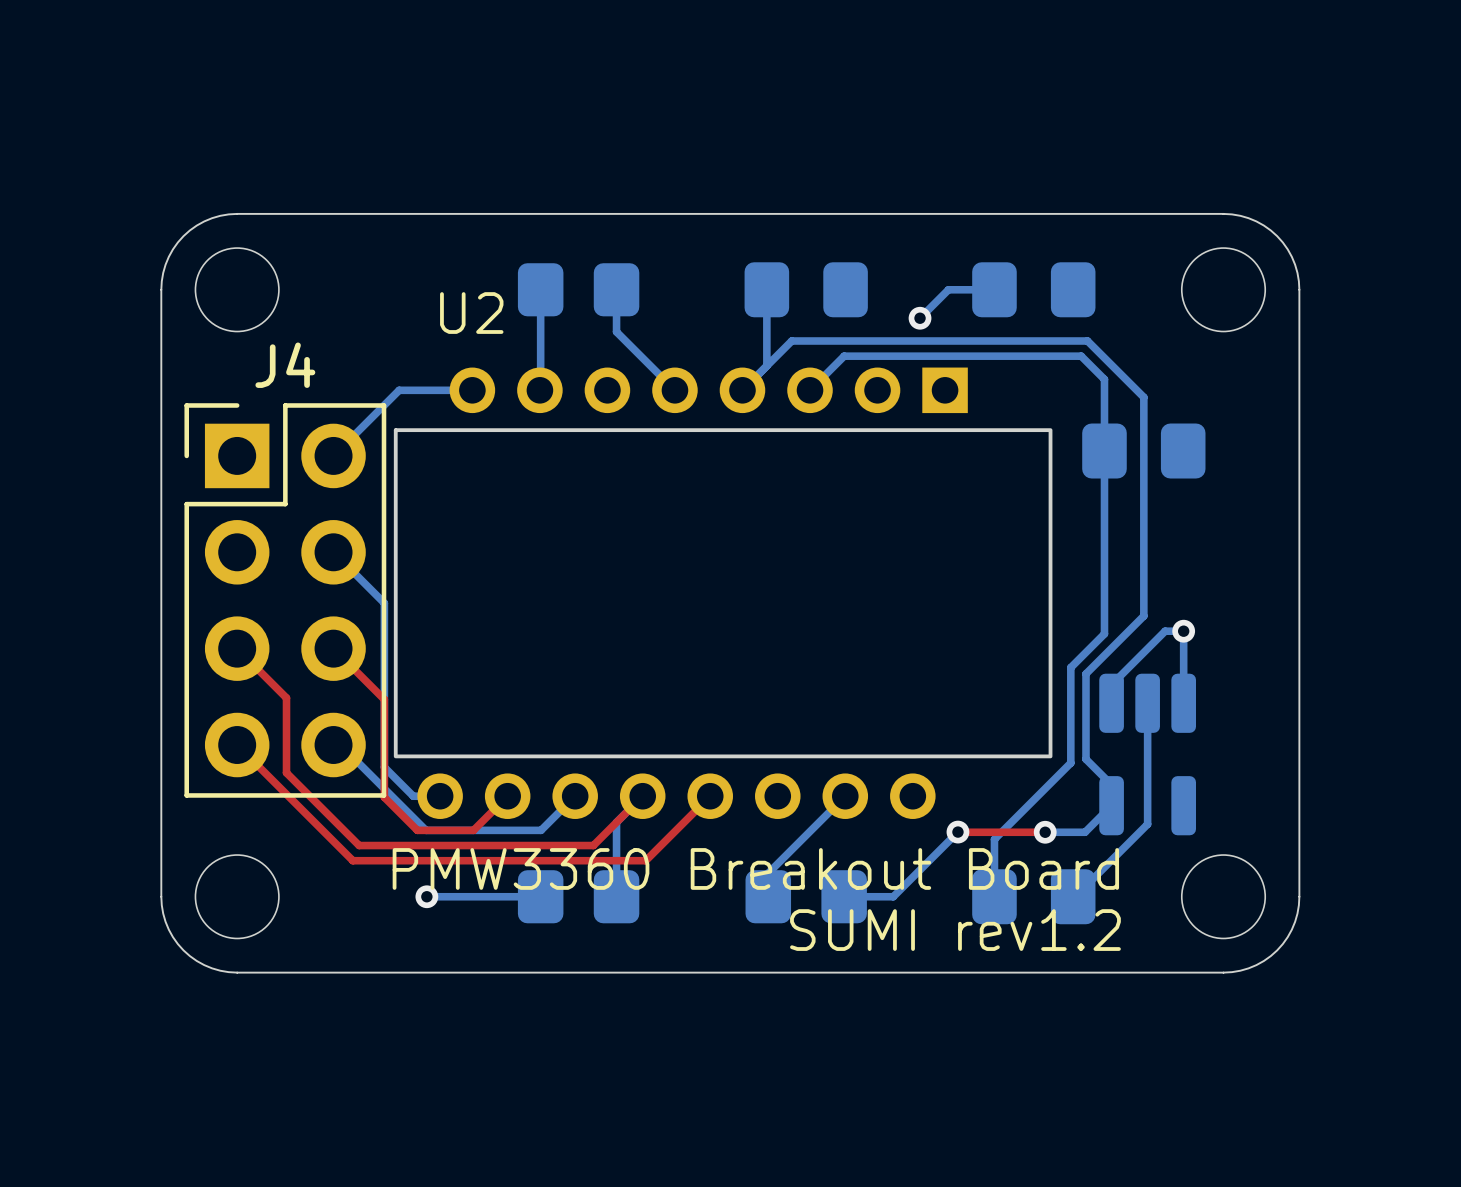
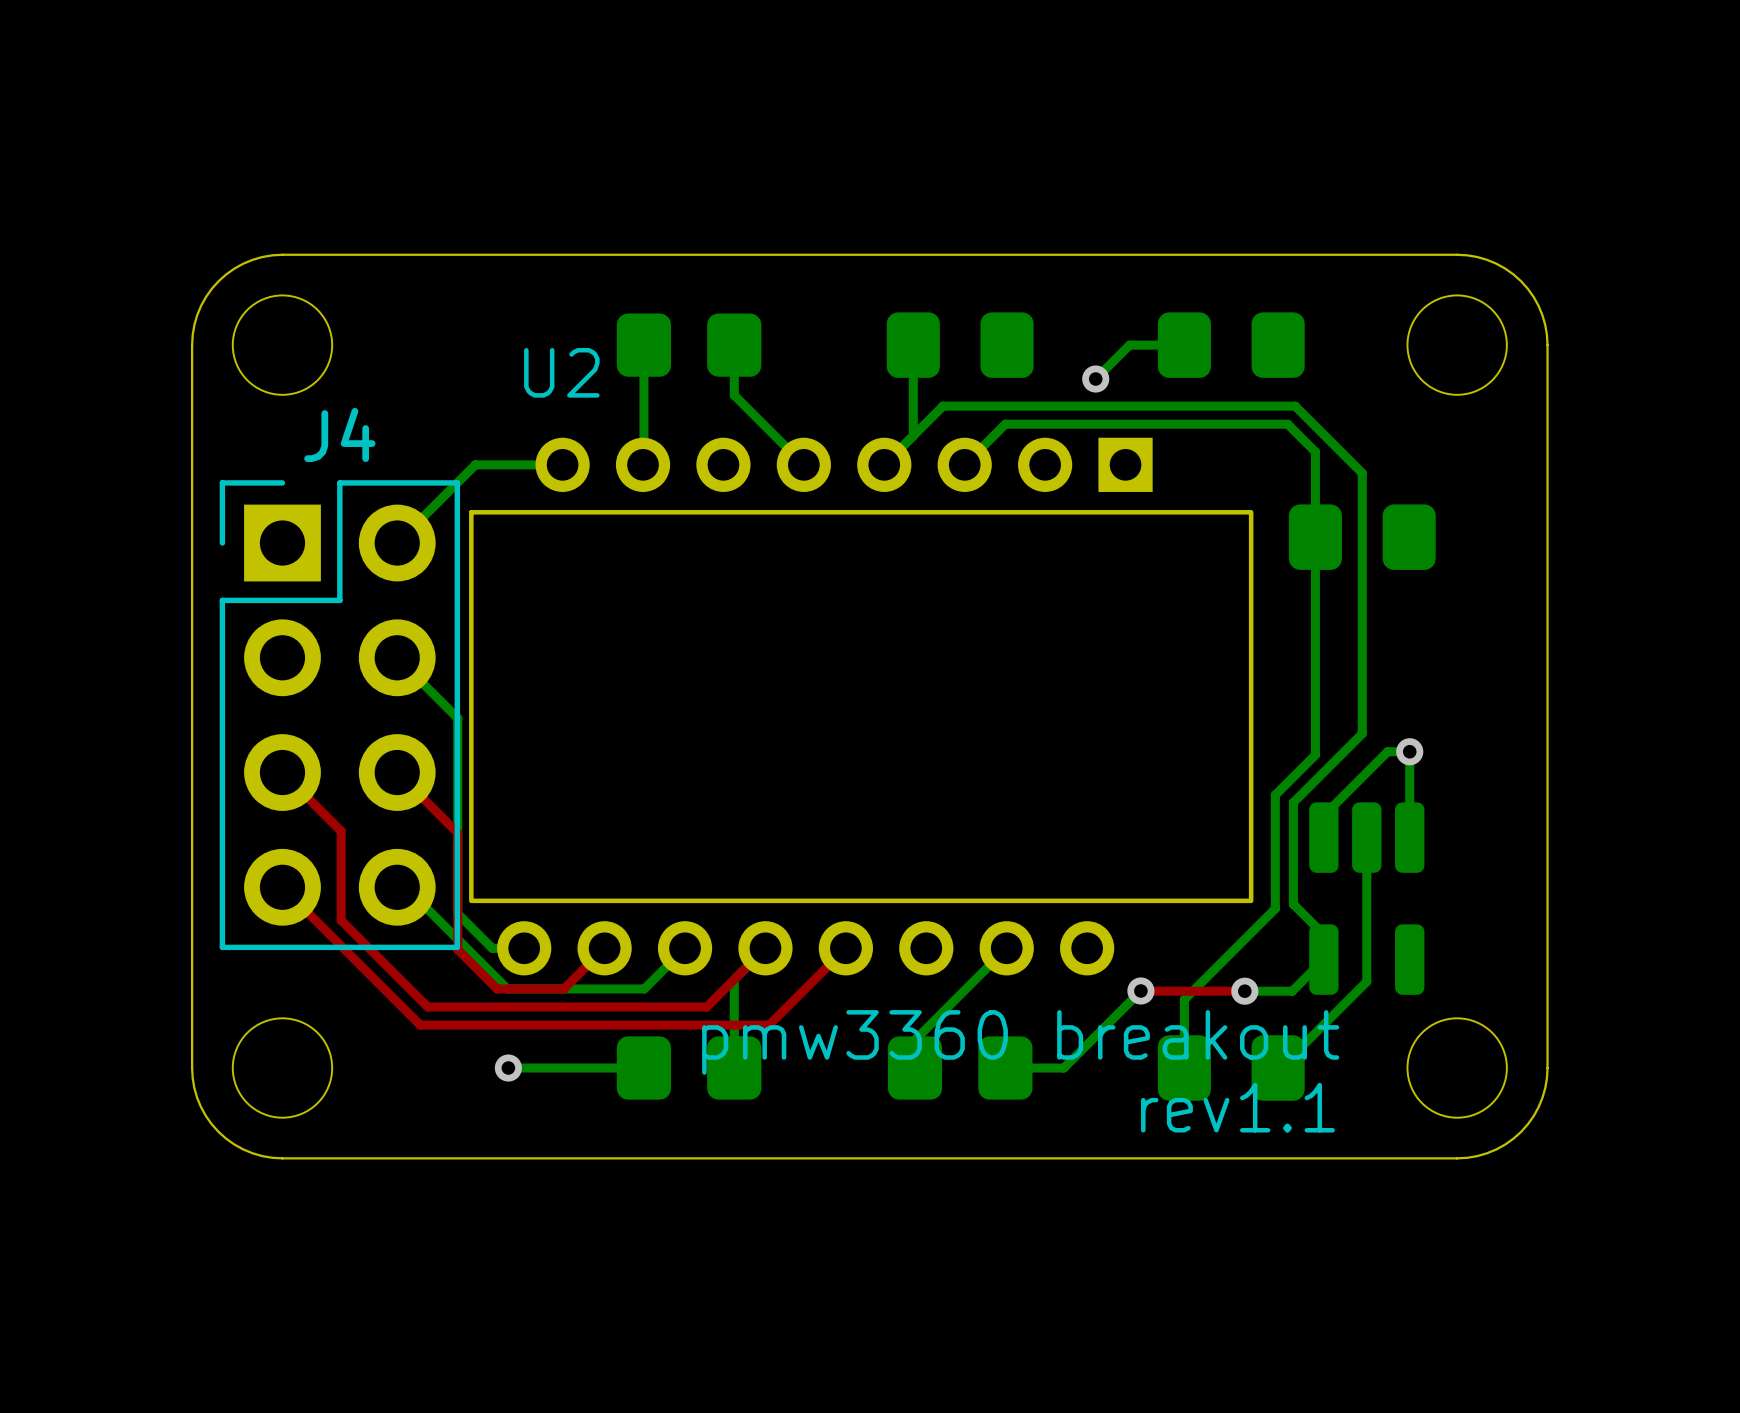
text: PMW3360 Breakout Board (755, 868) -> pmw3360 breakout (1020, 1042)
text: SUMI rev1.2 (955, 930) -> rev1.1 (1237, 1107)

